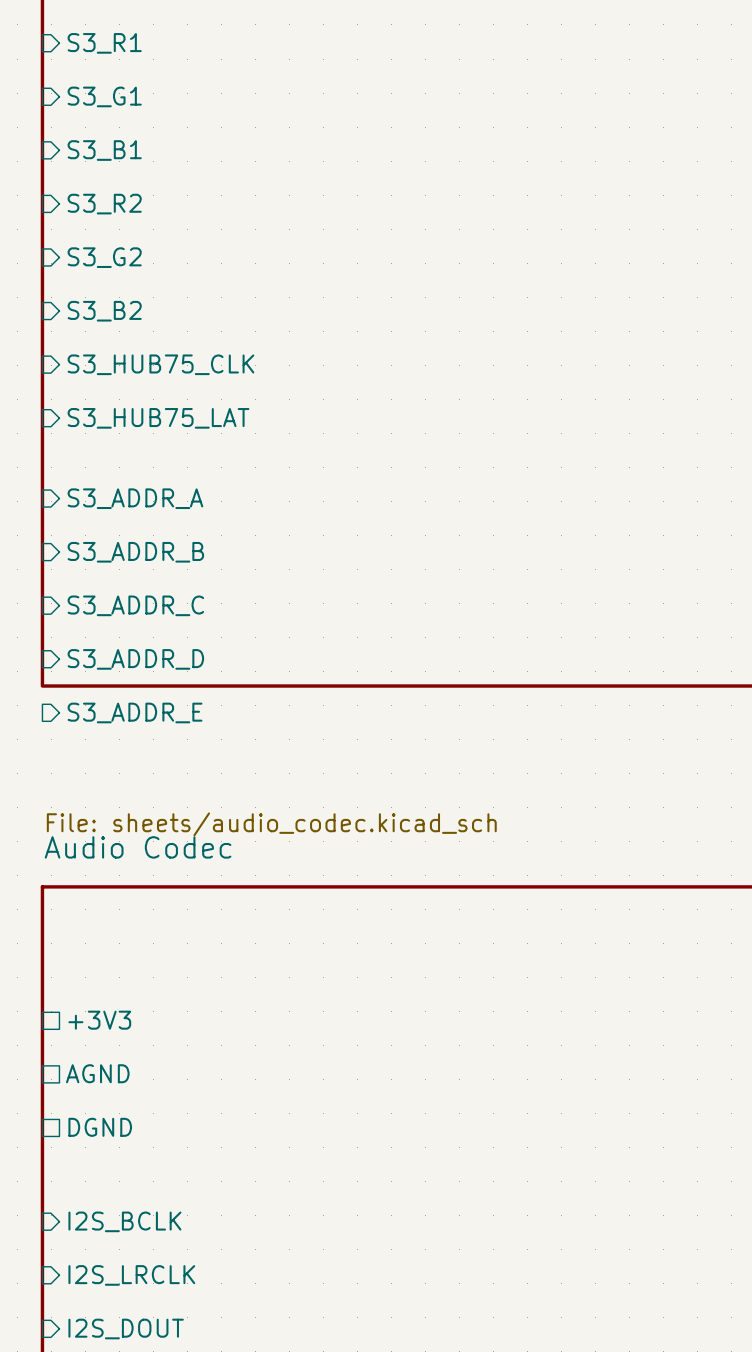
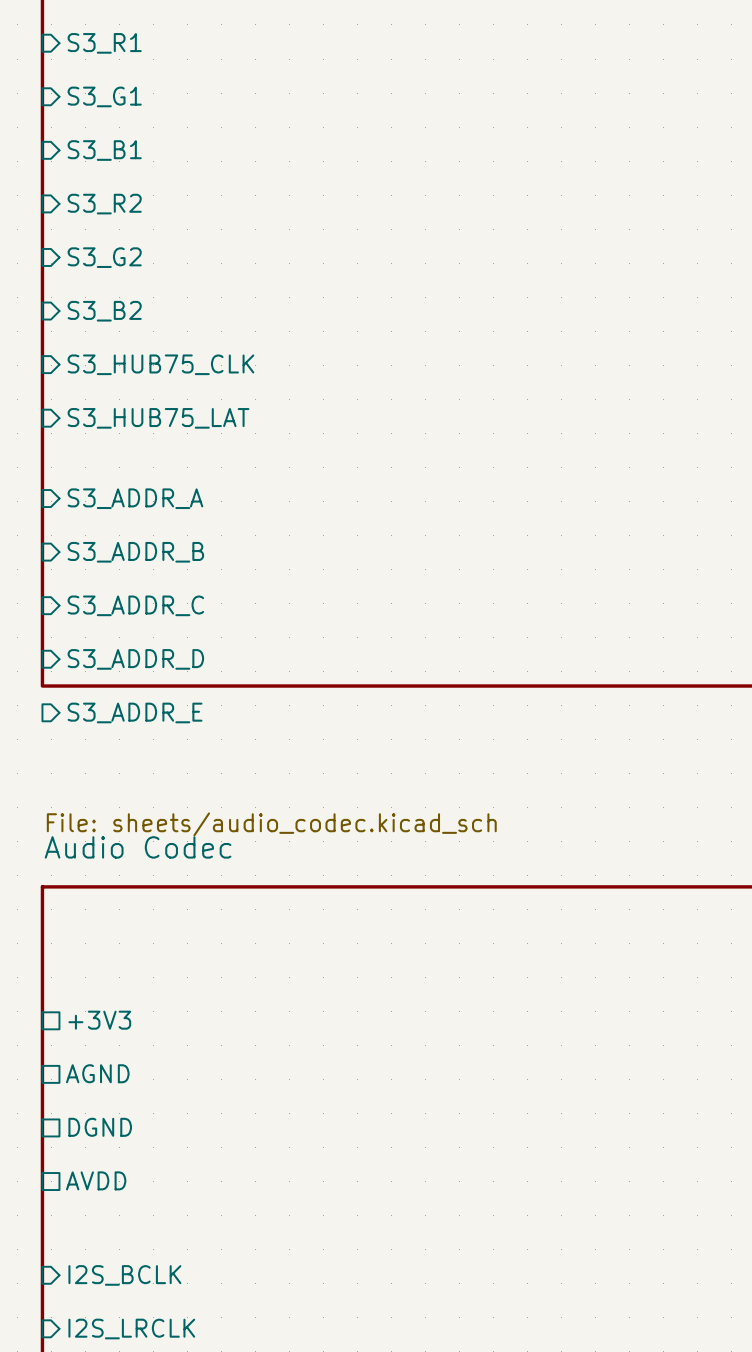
sheet pin: none -> AVDD (96, 1180)
sheet pin: I2S_BCLK (124, 1221) -> none
sheet pin: I2S_LRCLK (131, 1275) -> I2S_BCLK (124, 1275)
sheet pin: I2S_DOUT (126, 1329) -> I2S_LRCLK (131, 1329)

